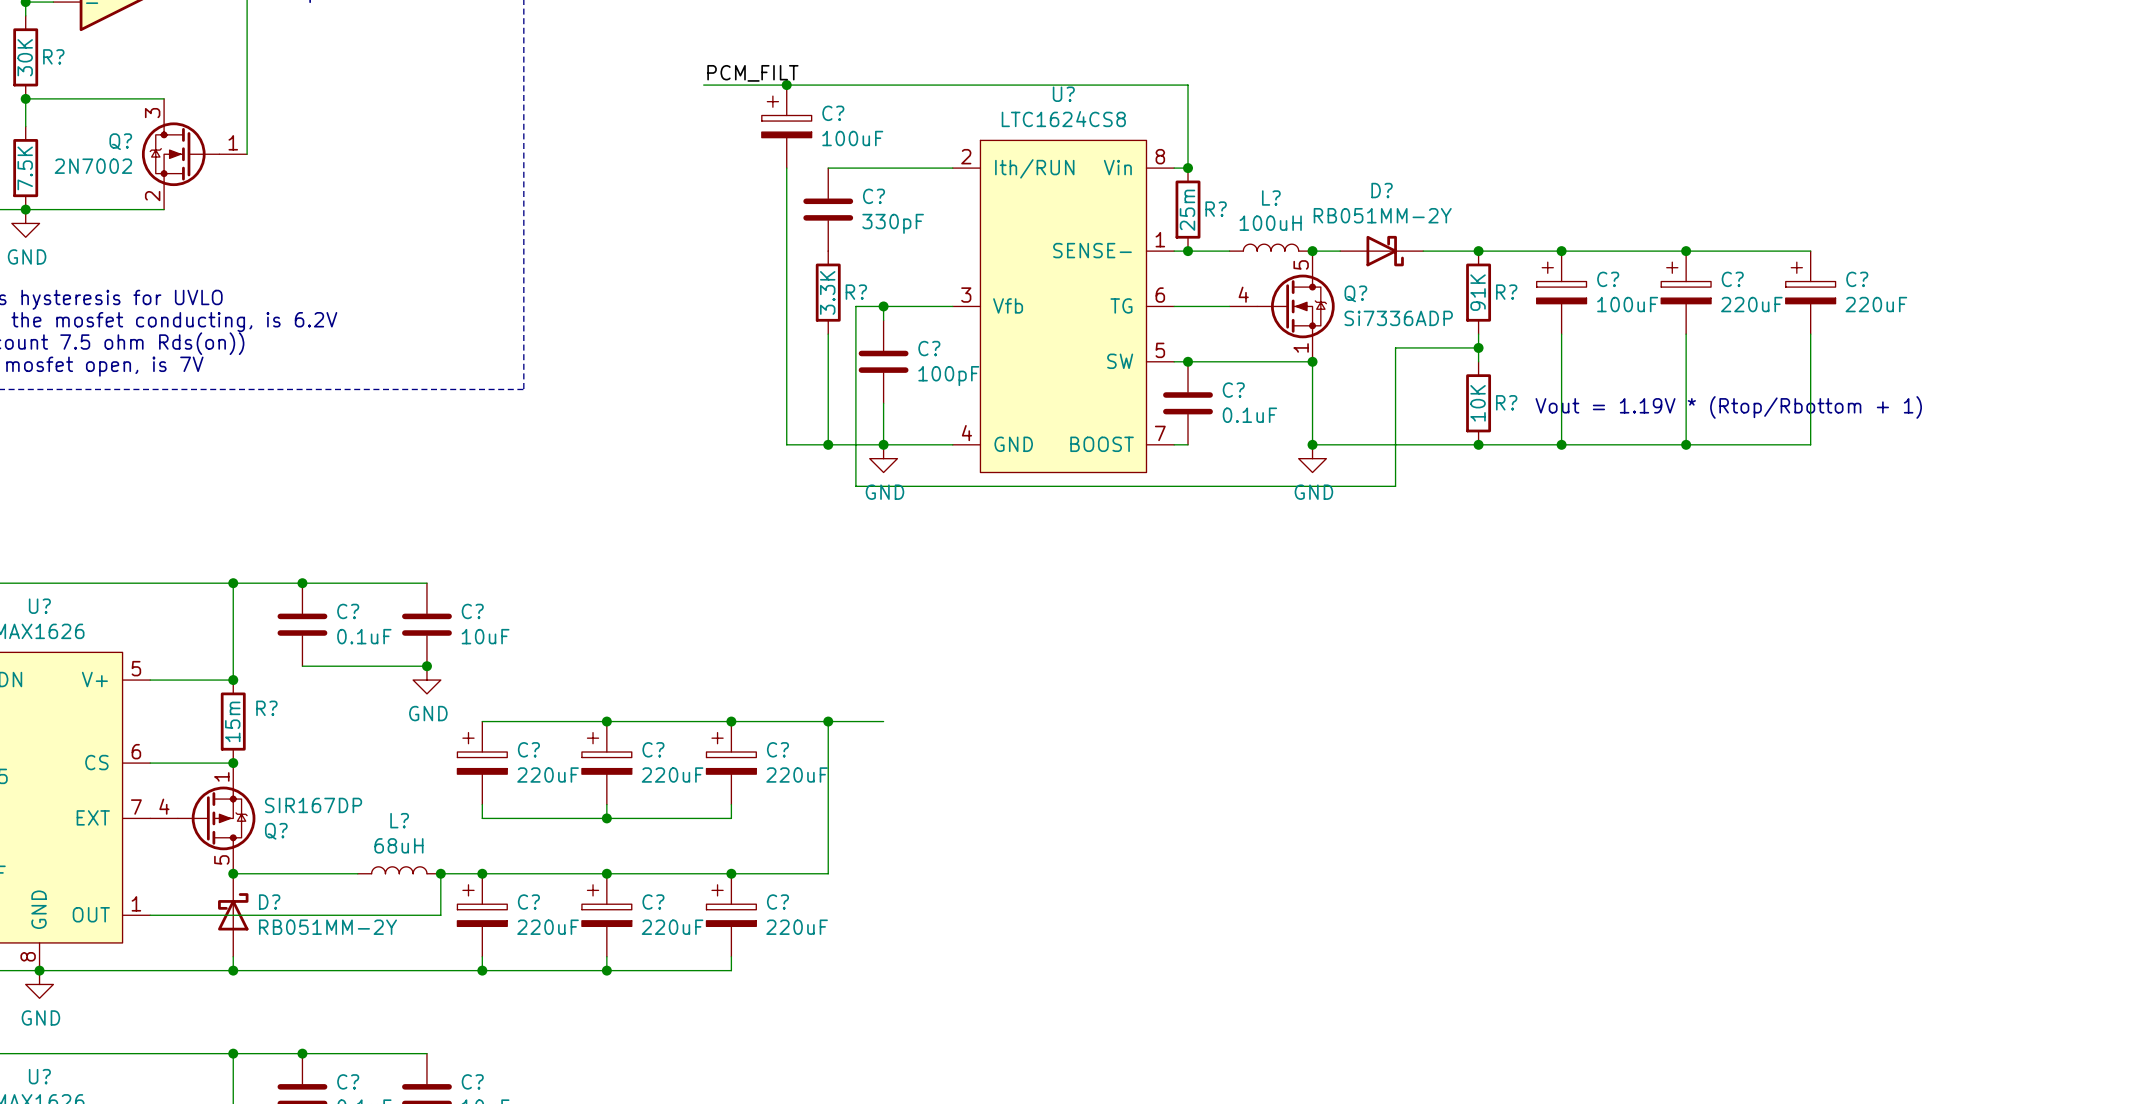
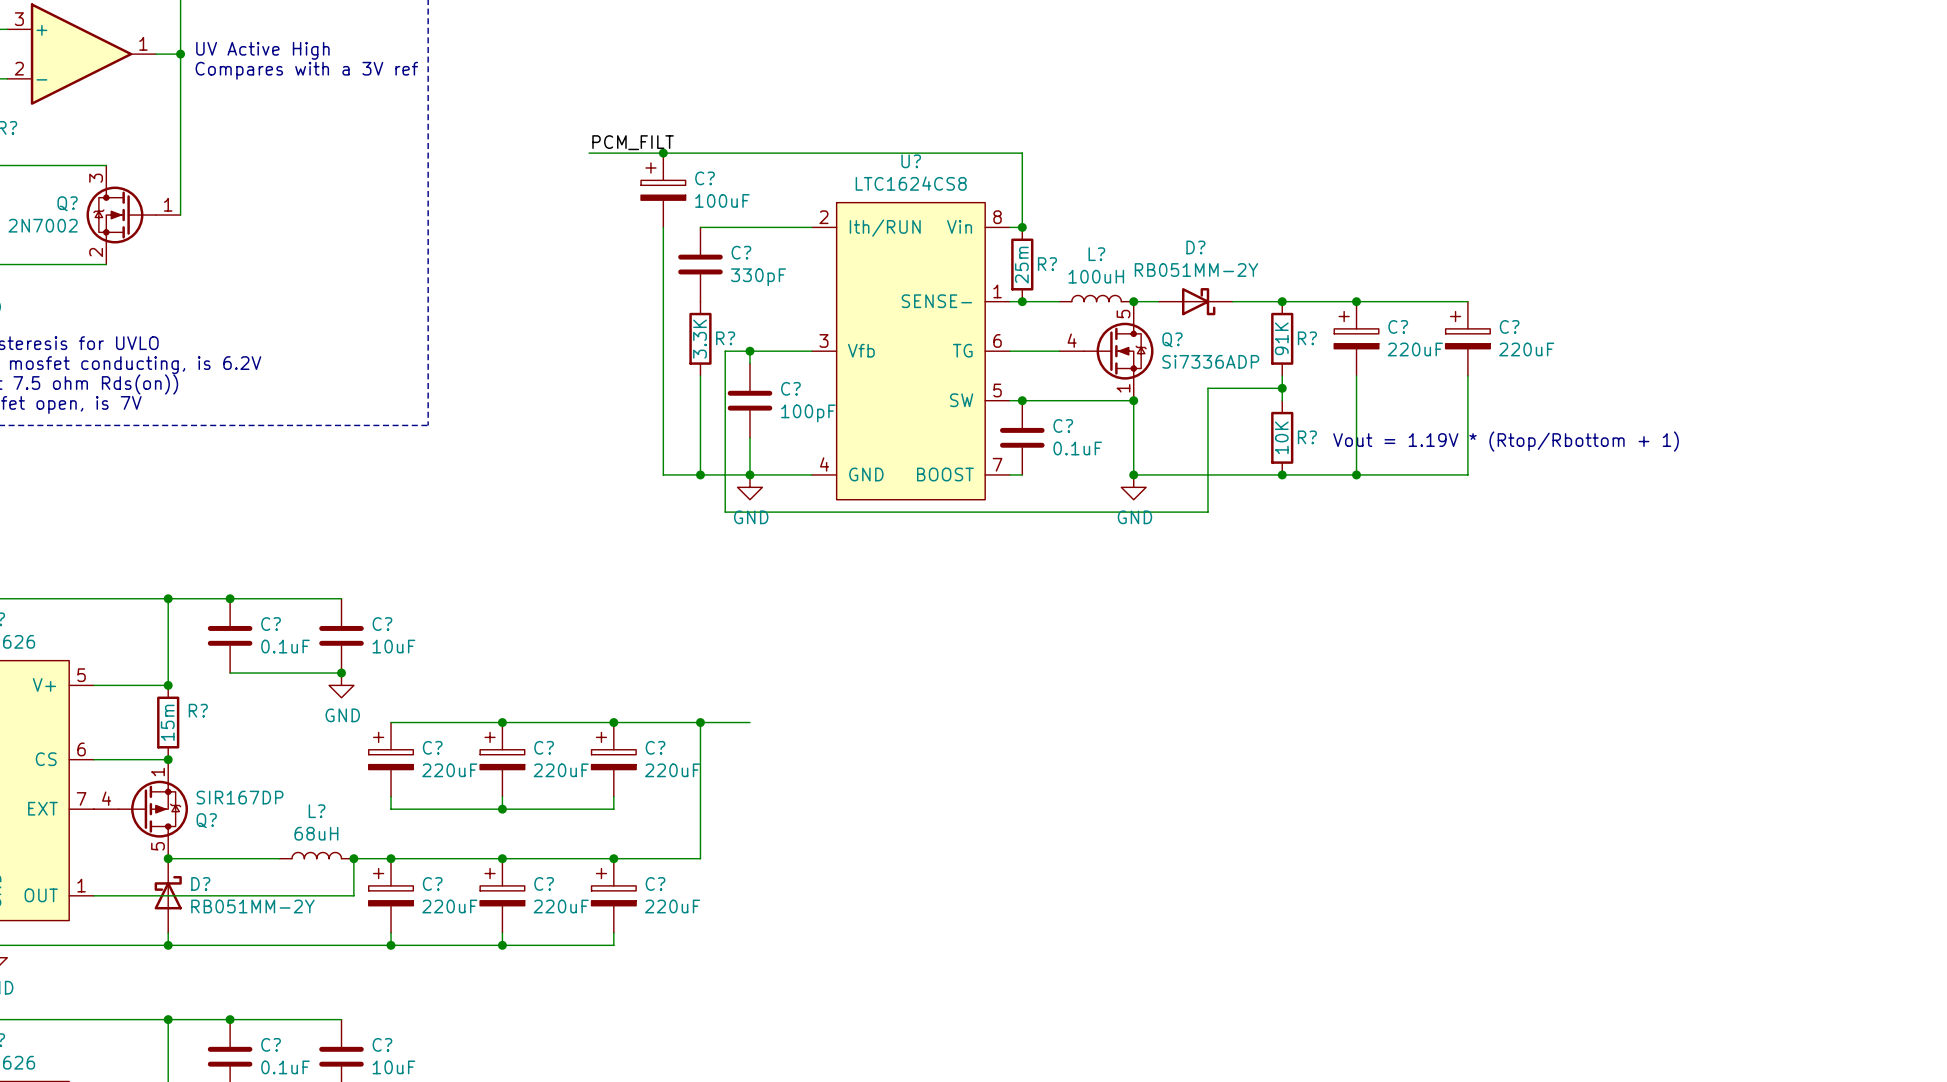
wire: (1686, 251) (1810, 251) -> none
junction: (1686, 251) -> none
C?: 220uF (1810, 292) -> none
C? value: 100uF (1627, 304) -> 220uF (1415, 349)
wire: (1810, 334) (1810, 444) (1686, 444) -> none
junction: (1686, 444) -> none

